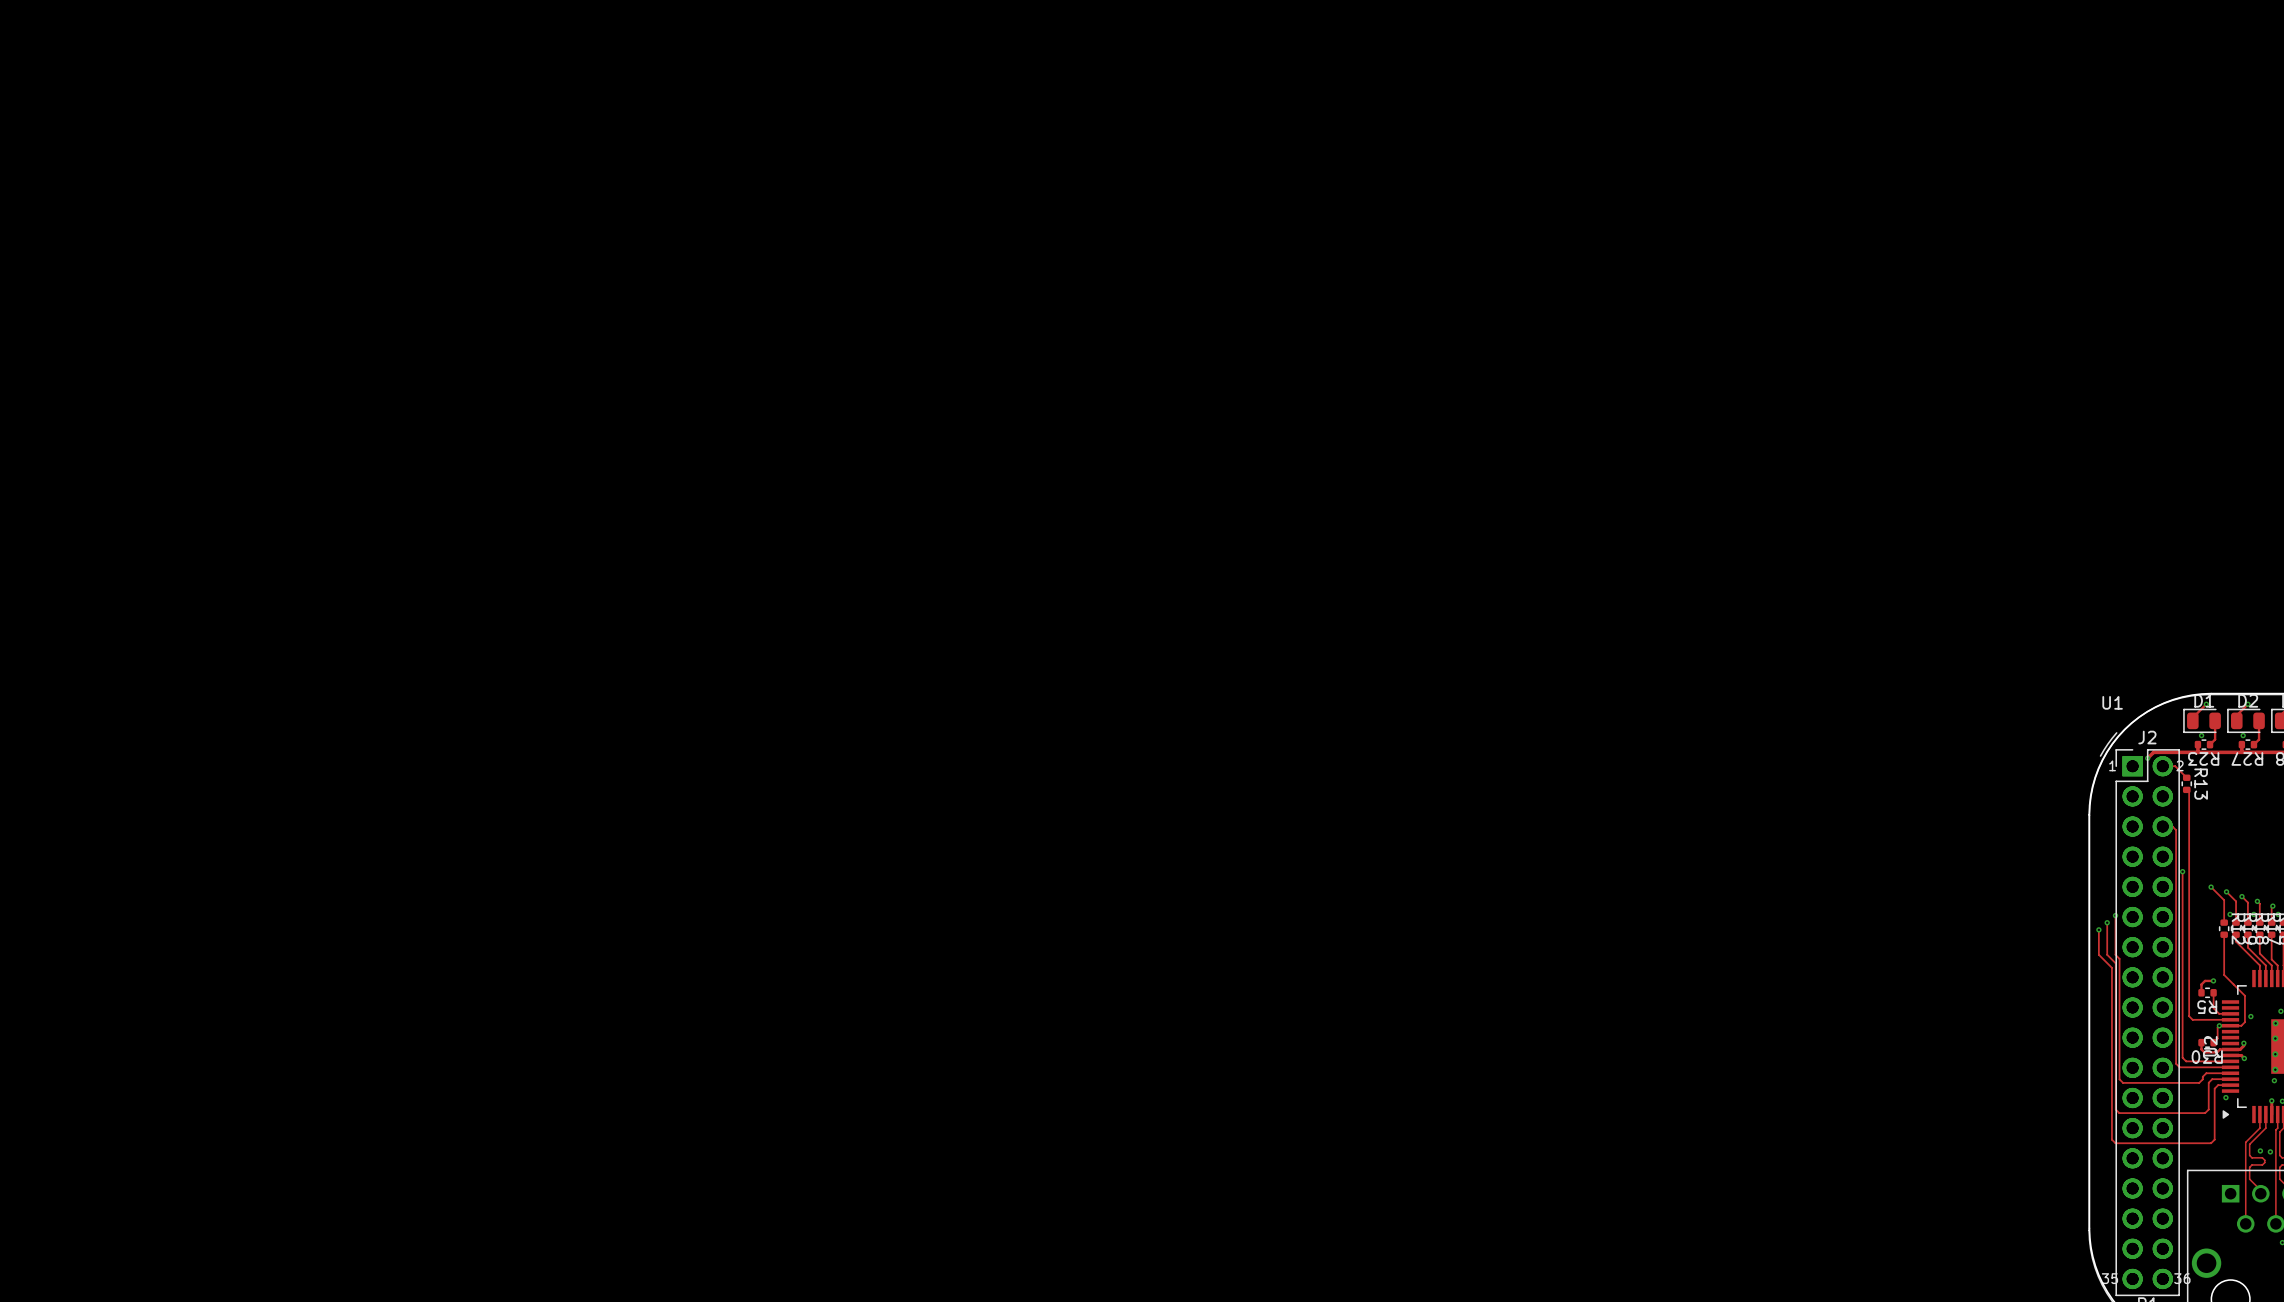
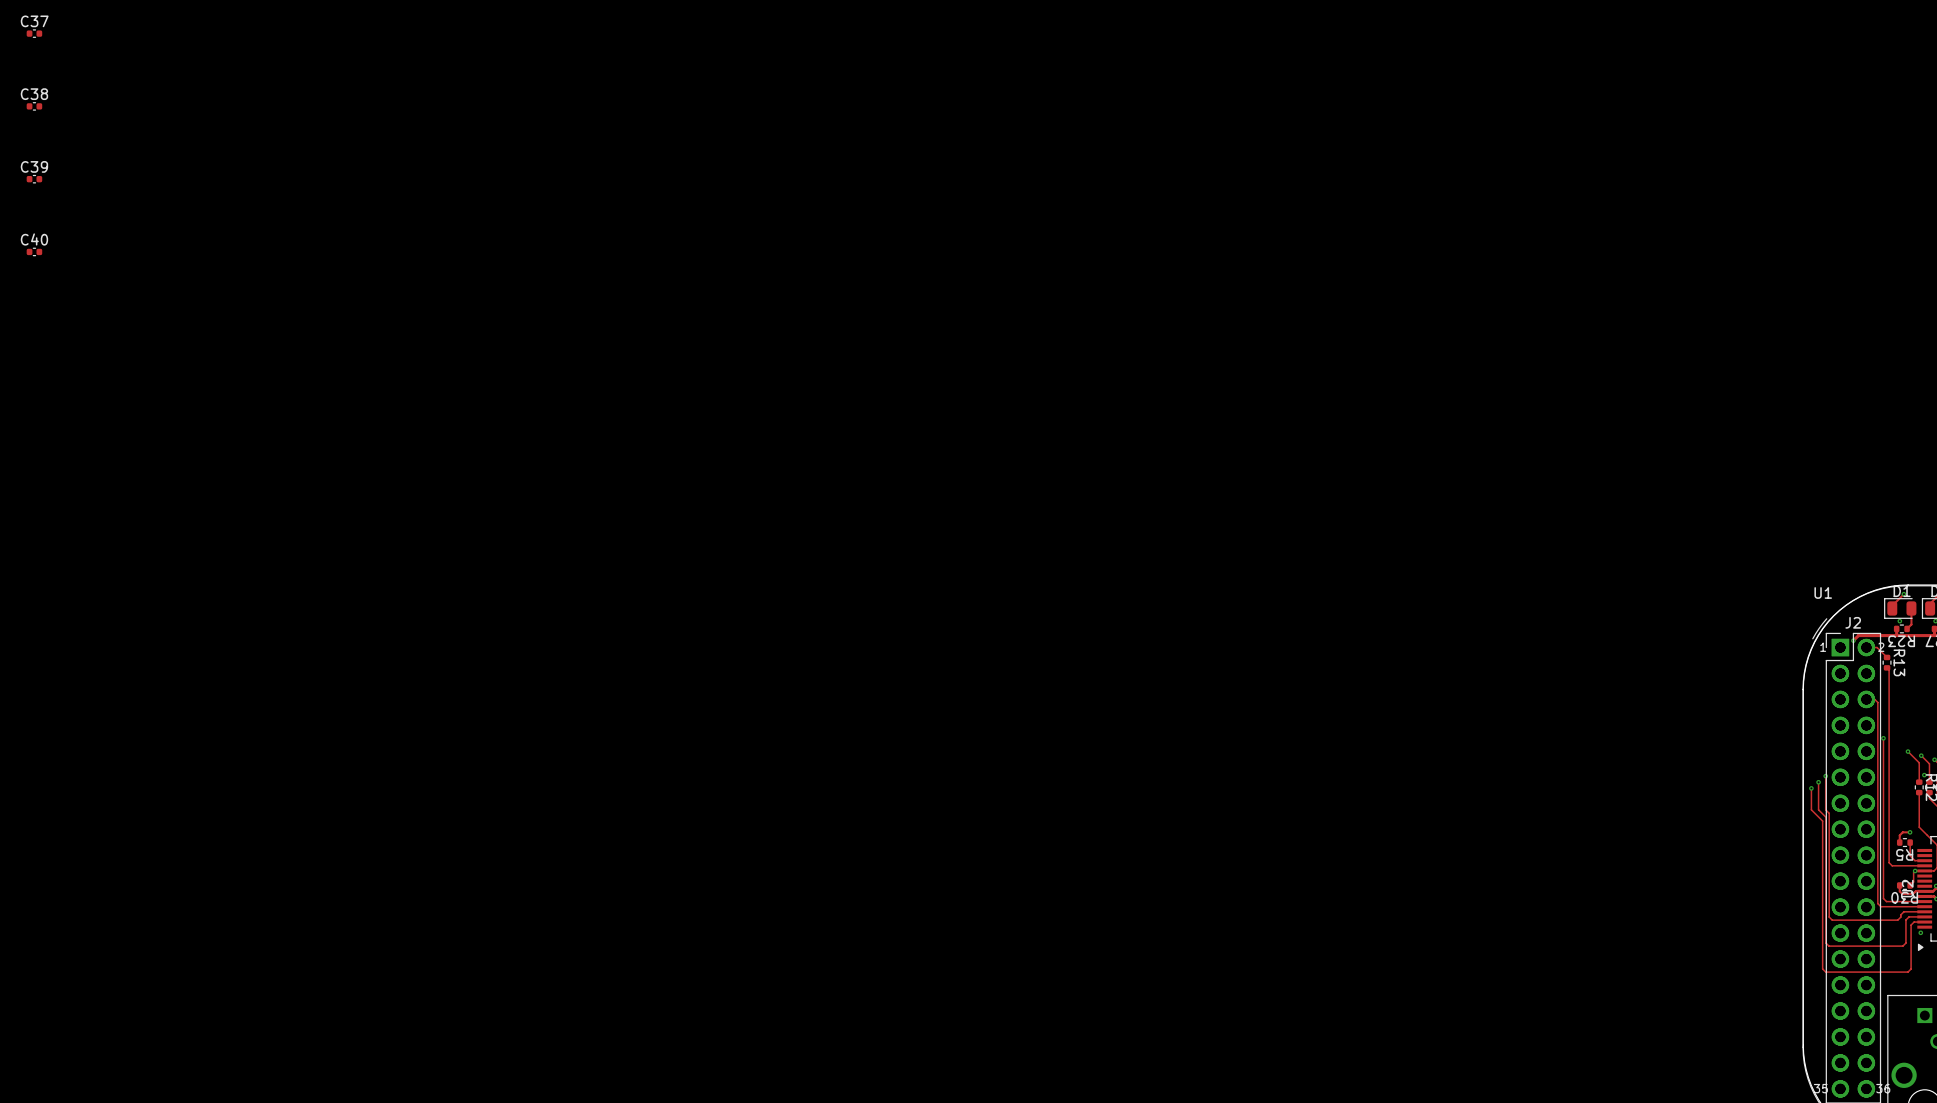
C37: none -> (34, 33)
C38: none -> (34, 106)
C39: none -> (34, 179)
C40: none -> (34, 251)

